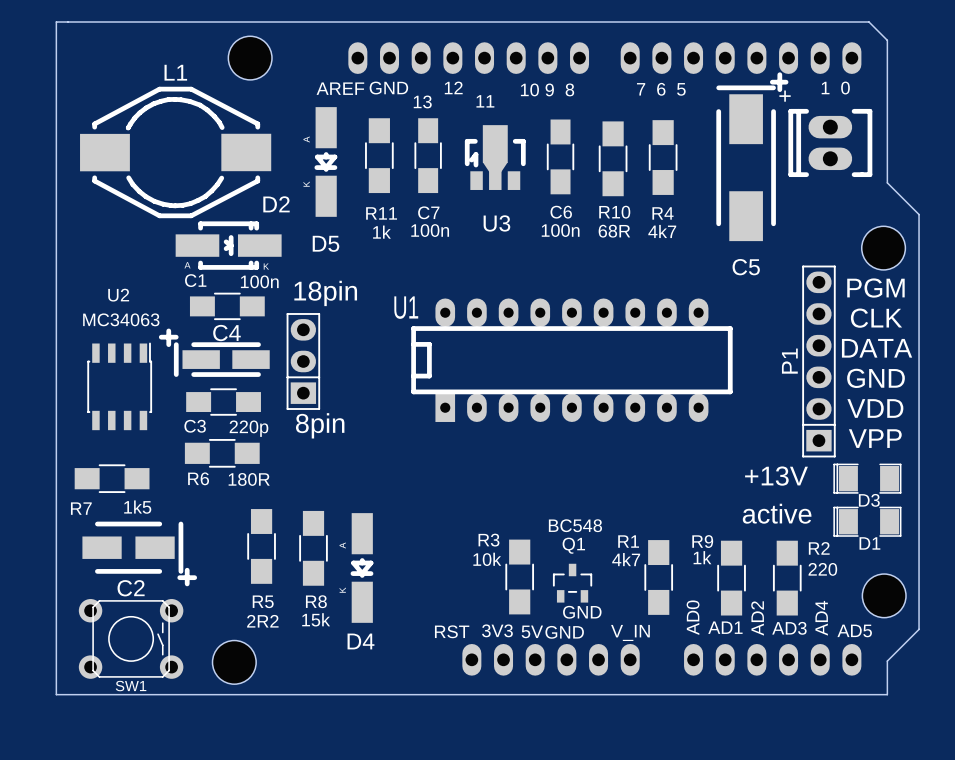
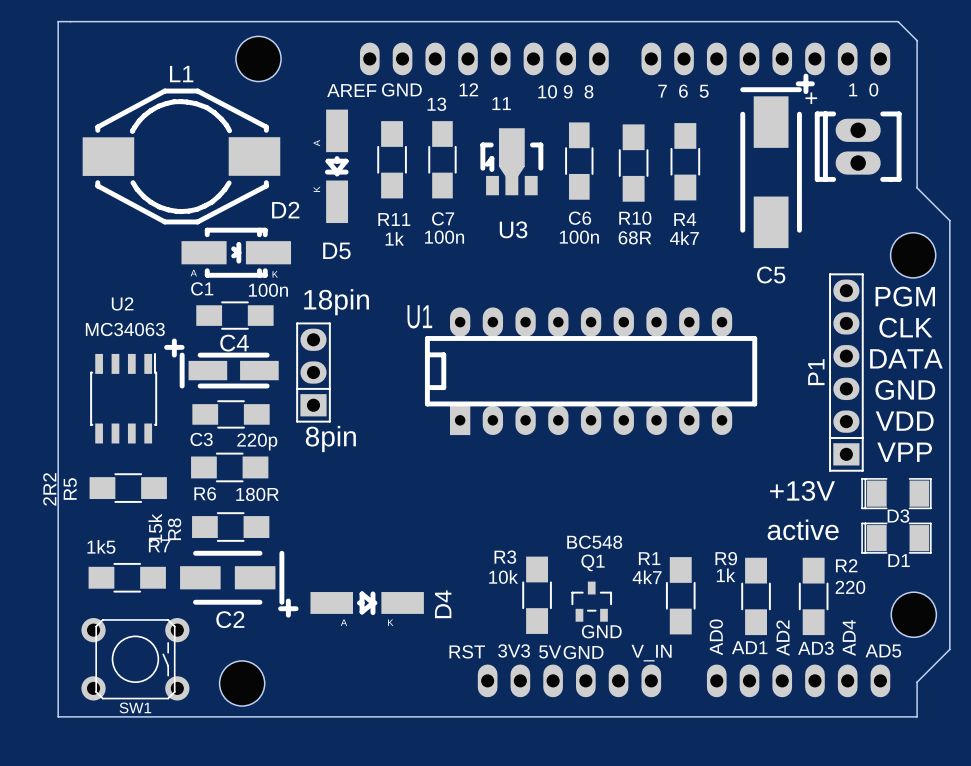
R7 position: (112, 478) -> (127, 577)
R7 value position: 1k5 (137, 507) -> 1k5 (101, 546)
R7 name position: R7 (81, 508) -> R7 (159, 545)
R5 rotation: 0° (261, 546) -> 90° clockwise (128, 488)
R5 position: (261, 546) -> (128, 488)
R8 rotation: 0° (313, 548) -> 90° clockwise (230, 527)
R8 position: (313, 548) -> (230, 527)
C2 position: (139, 553) -> (239, 584)
D4 rotation: 0° (361, 567) -> 90° counterclockwise (367, 603)

